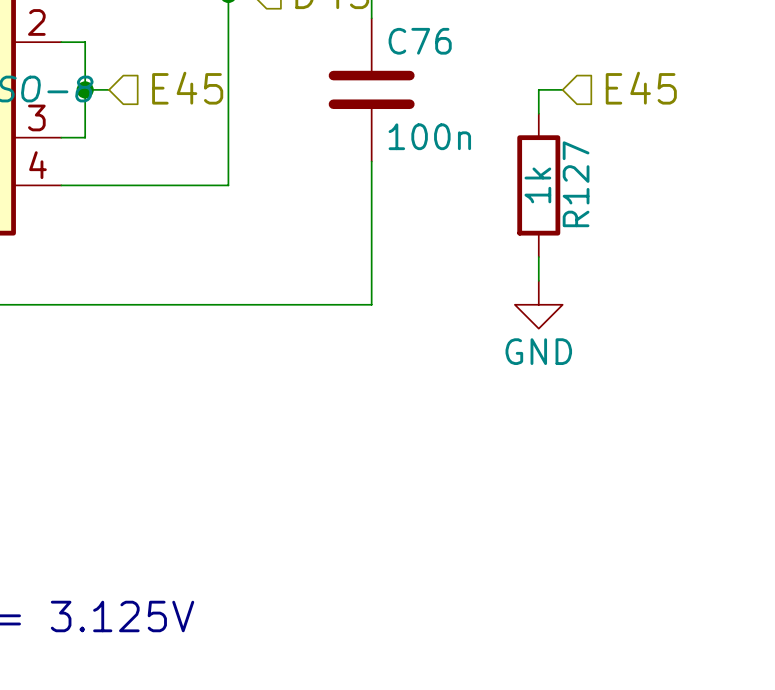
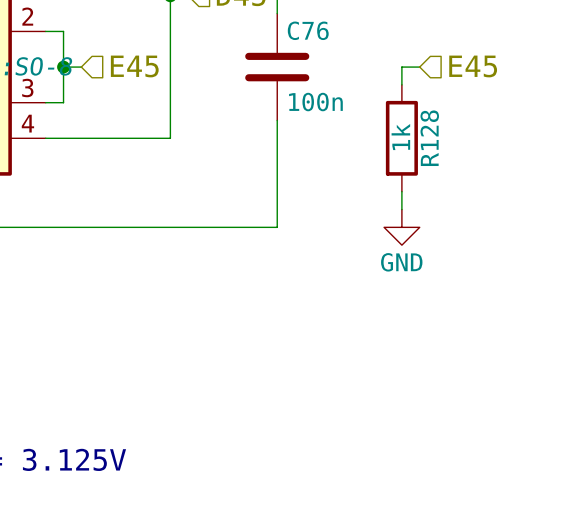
R127 name: R127 (576, 184) -> R128 (429, 138)

